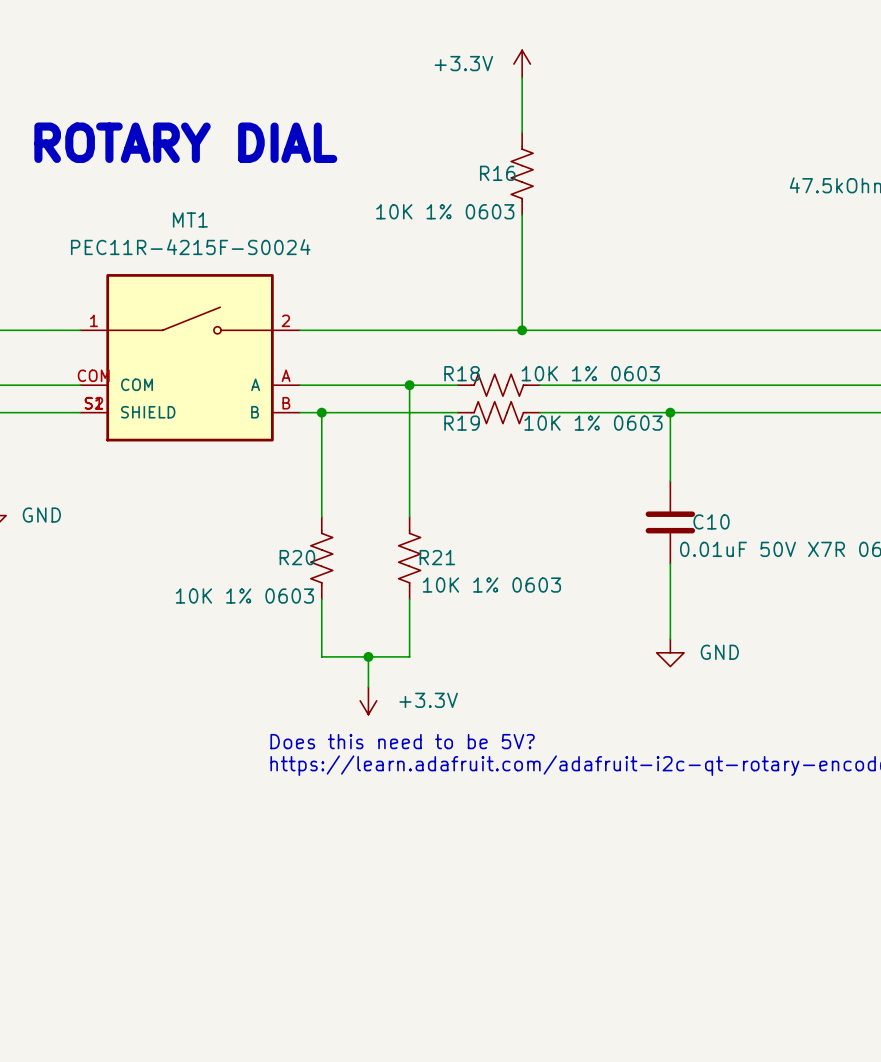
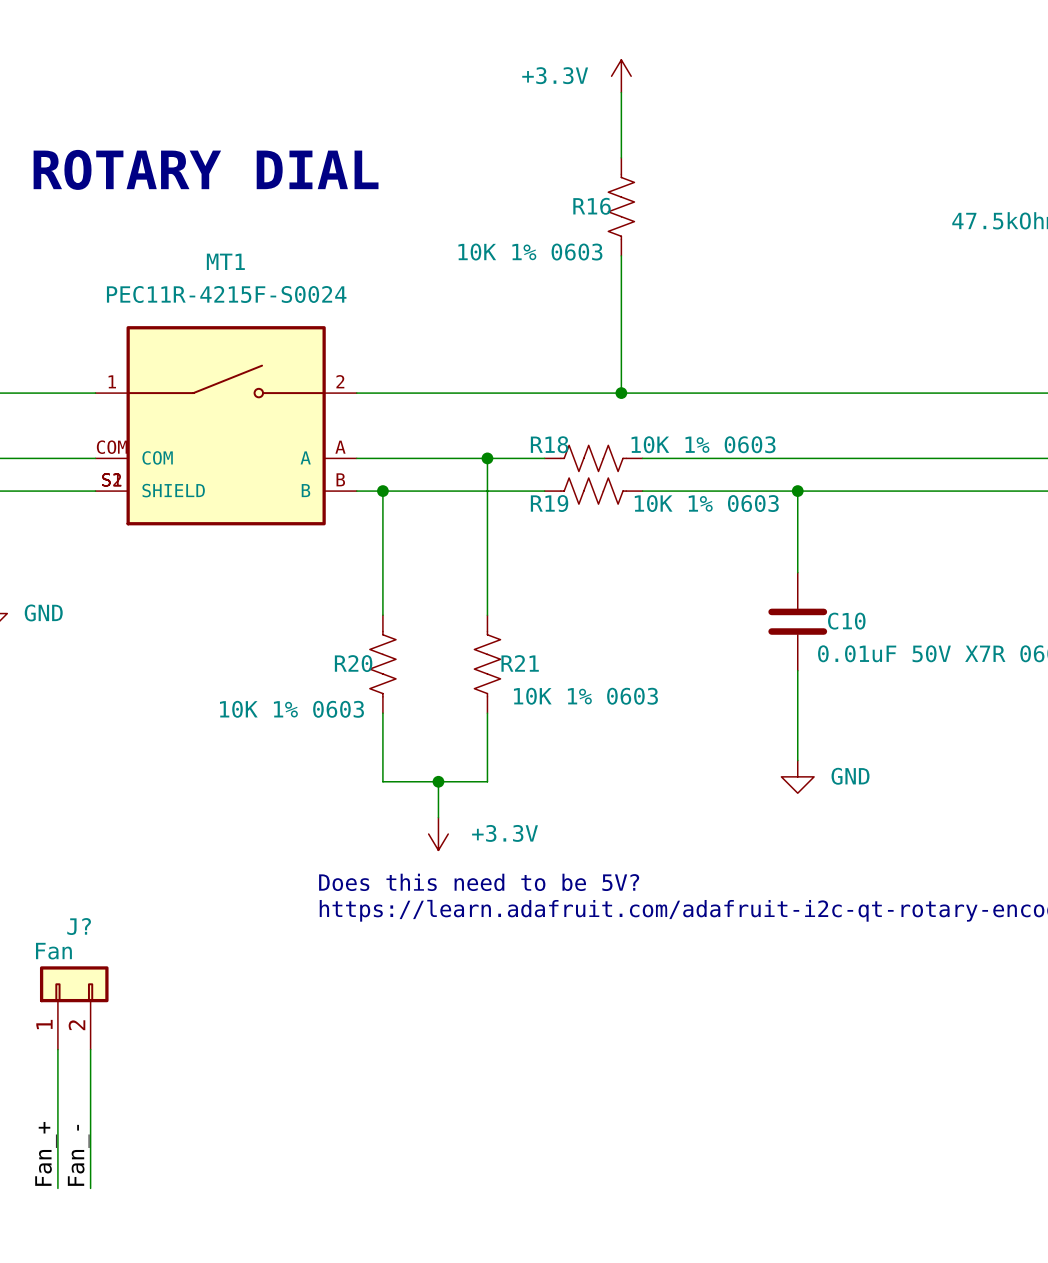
J?: none -> Fan (74, 1007)
wire: none -> (57, 1049) (57, 1188)
wire: none -> (90, 1049) (90, 1188)
label: none -> Fan_+ (46, 1153)
label: none -> Fan_- (78, 1155)

